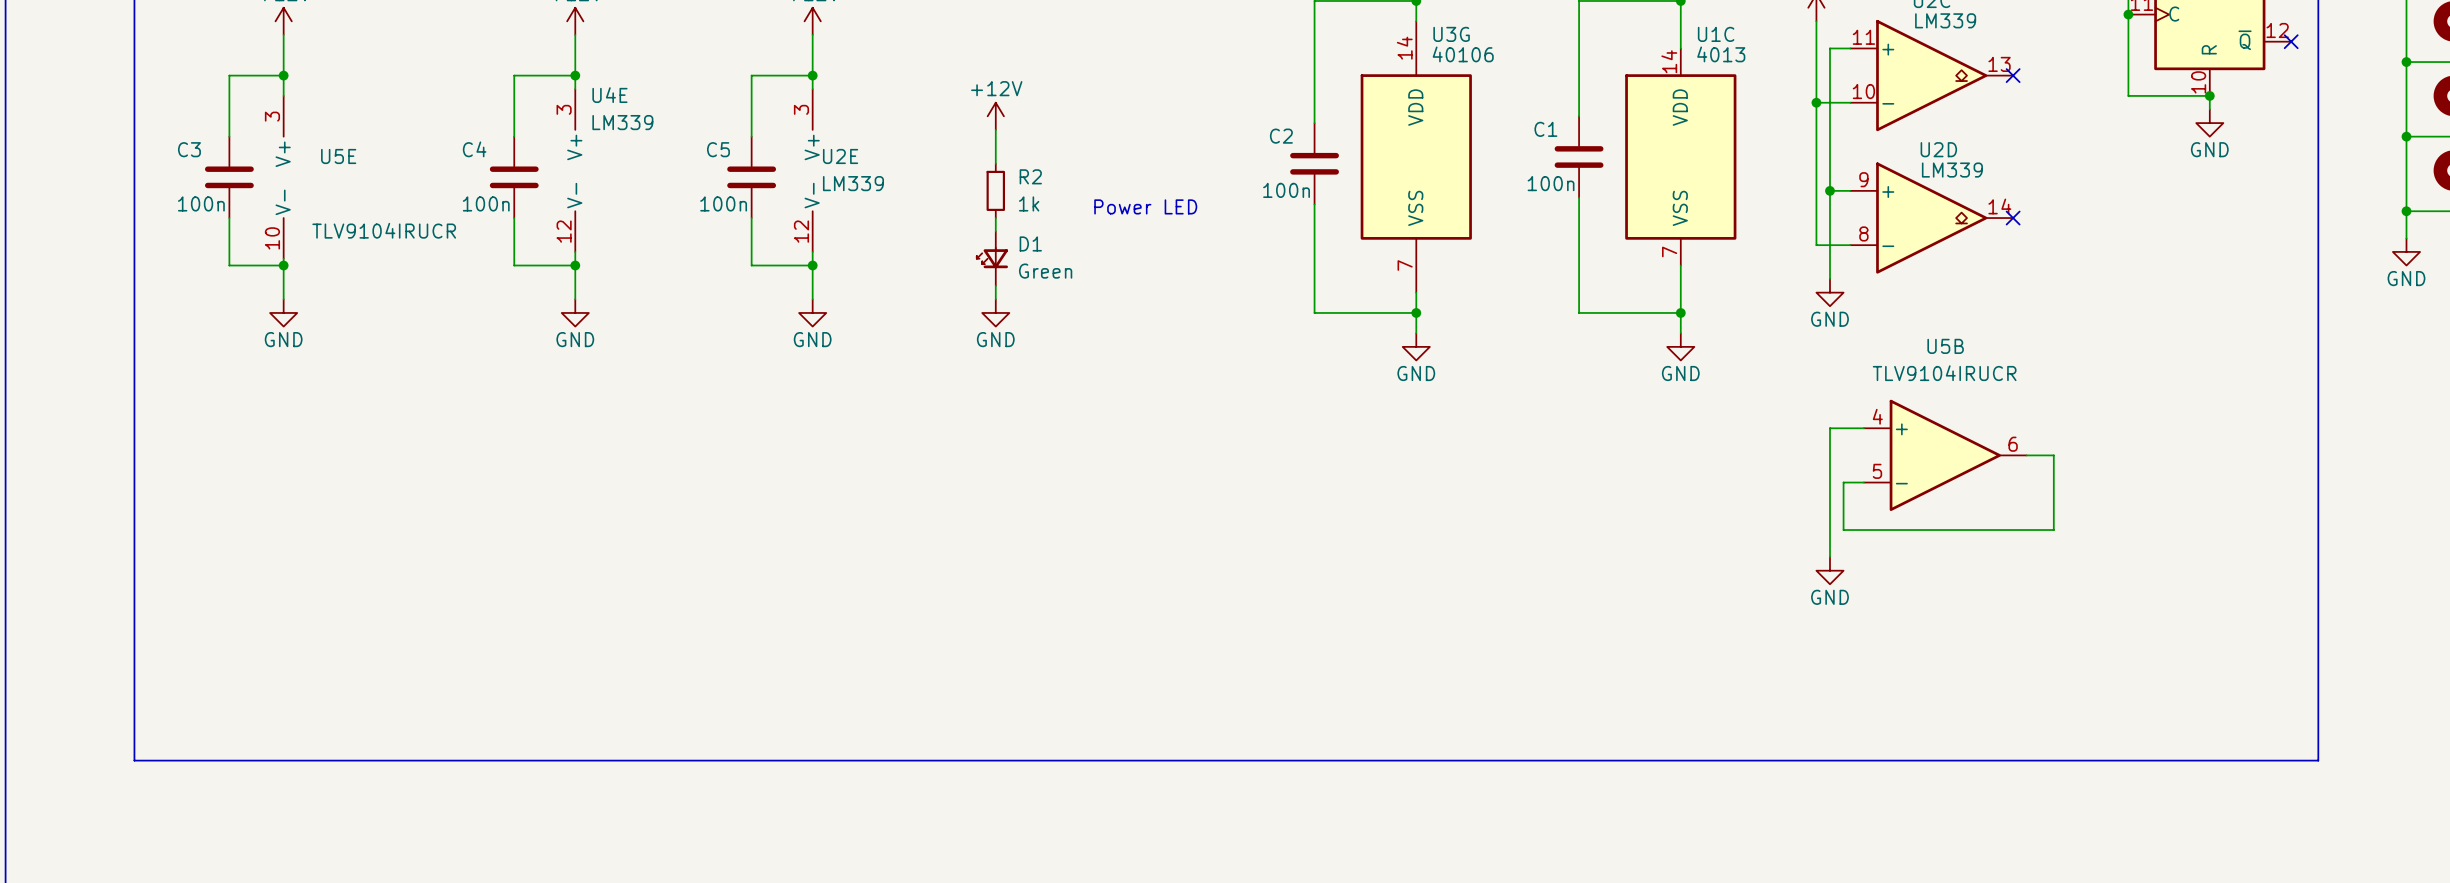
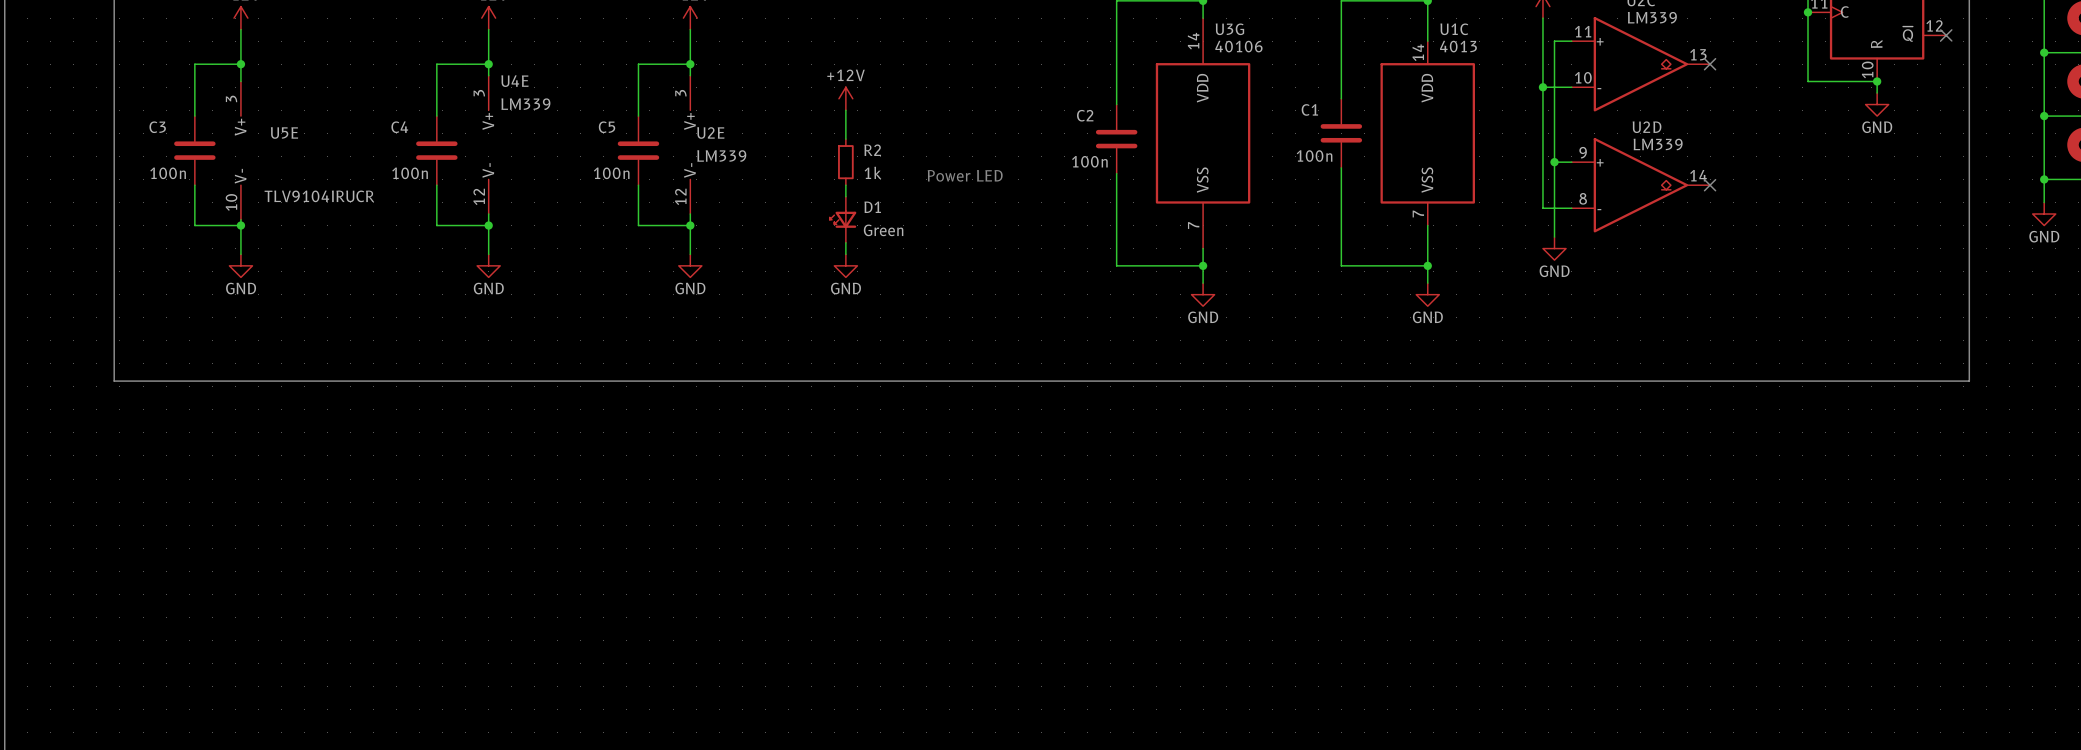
wire: (1863, 428) (1830, 428) (1830, 557) -> none
line: (134, 448) (134, 760) (2318, 760) (2318, 448) -> (114, 381) (1969, 381)
U5B: TLV9104IRUCR (1945, 455) -> none
wire: (2026, 455) (2053, 455) (2053, 530) (1843, 530) (1843, 482) (1863, 482) -> none
power symbol: GND (1830, 570) -> none

